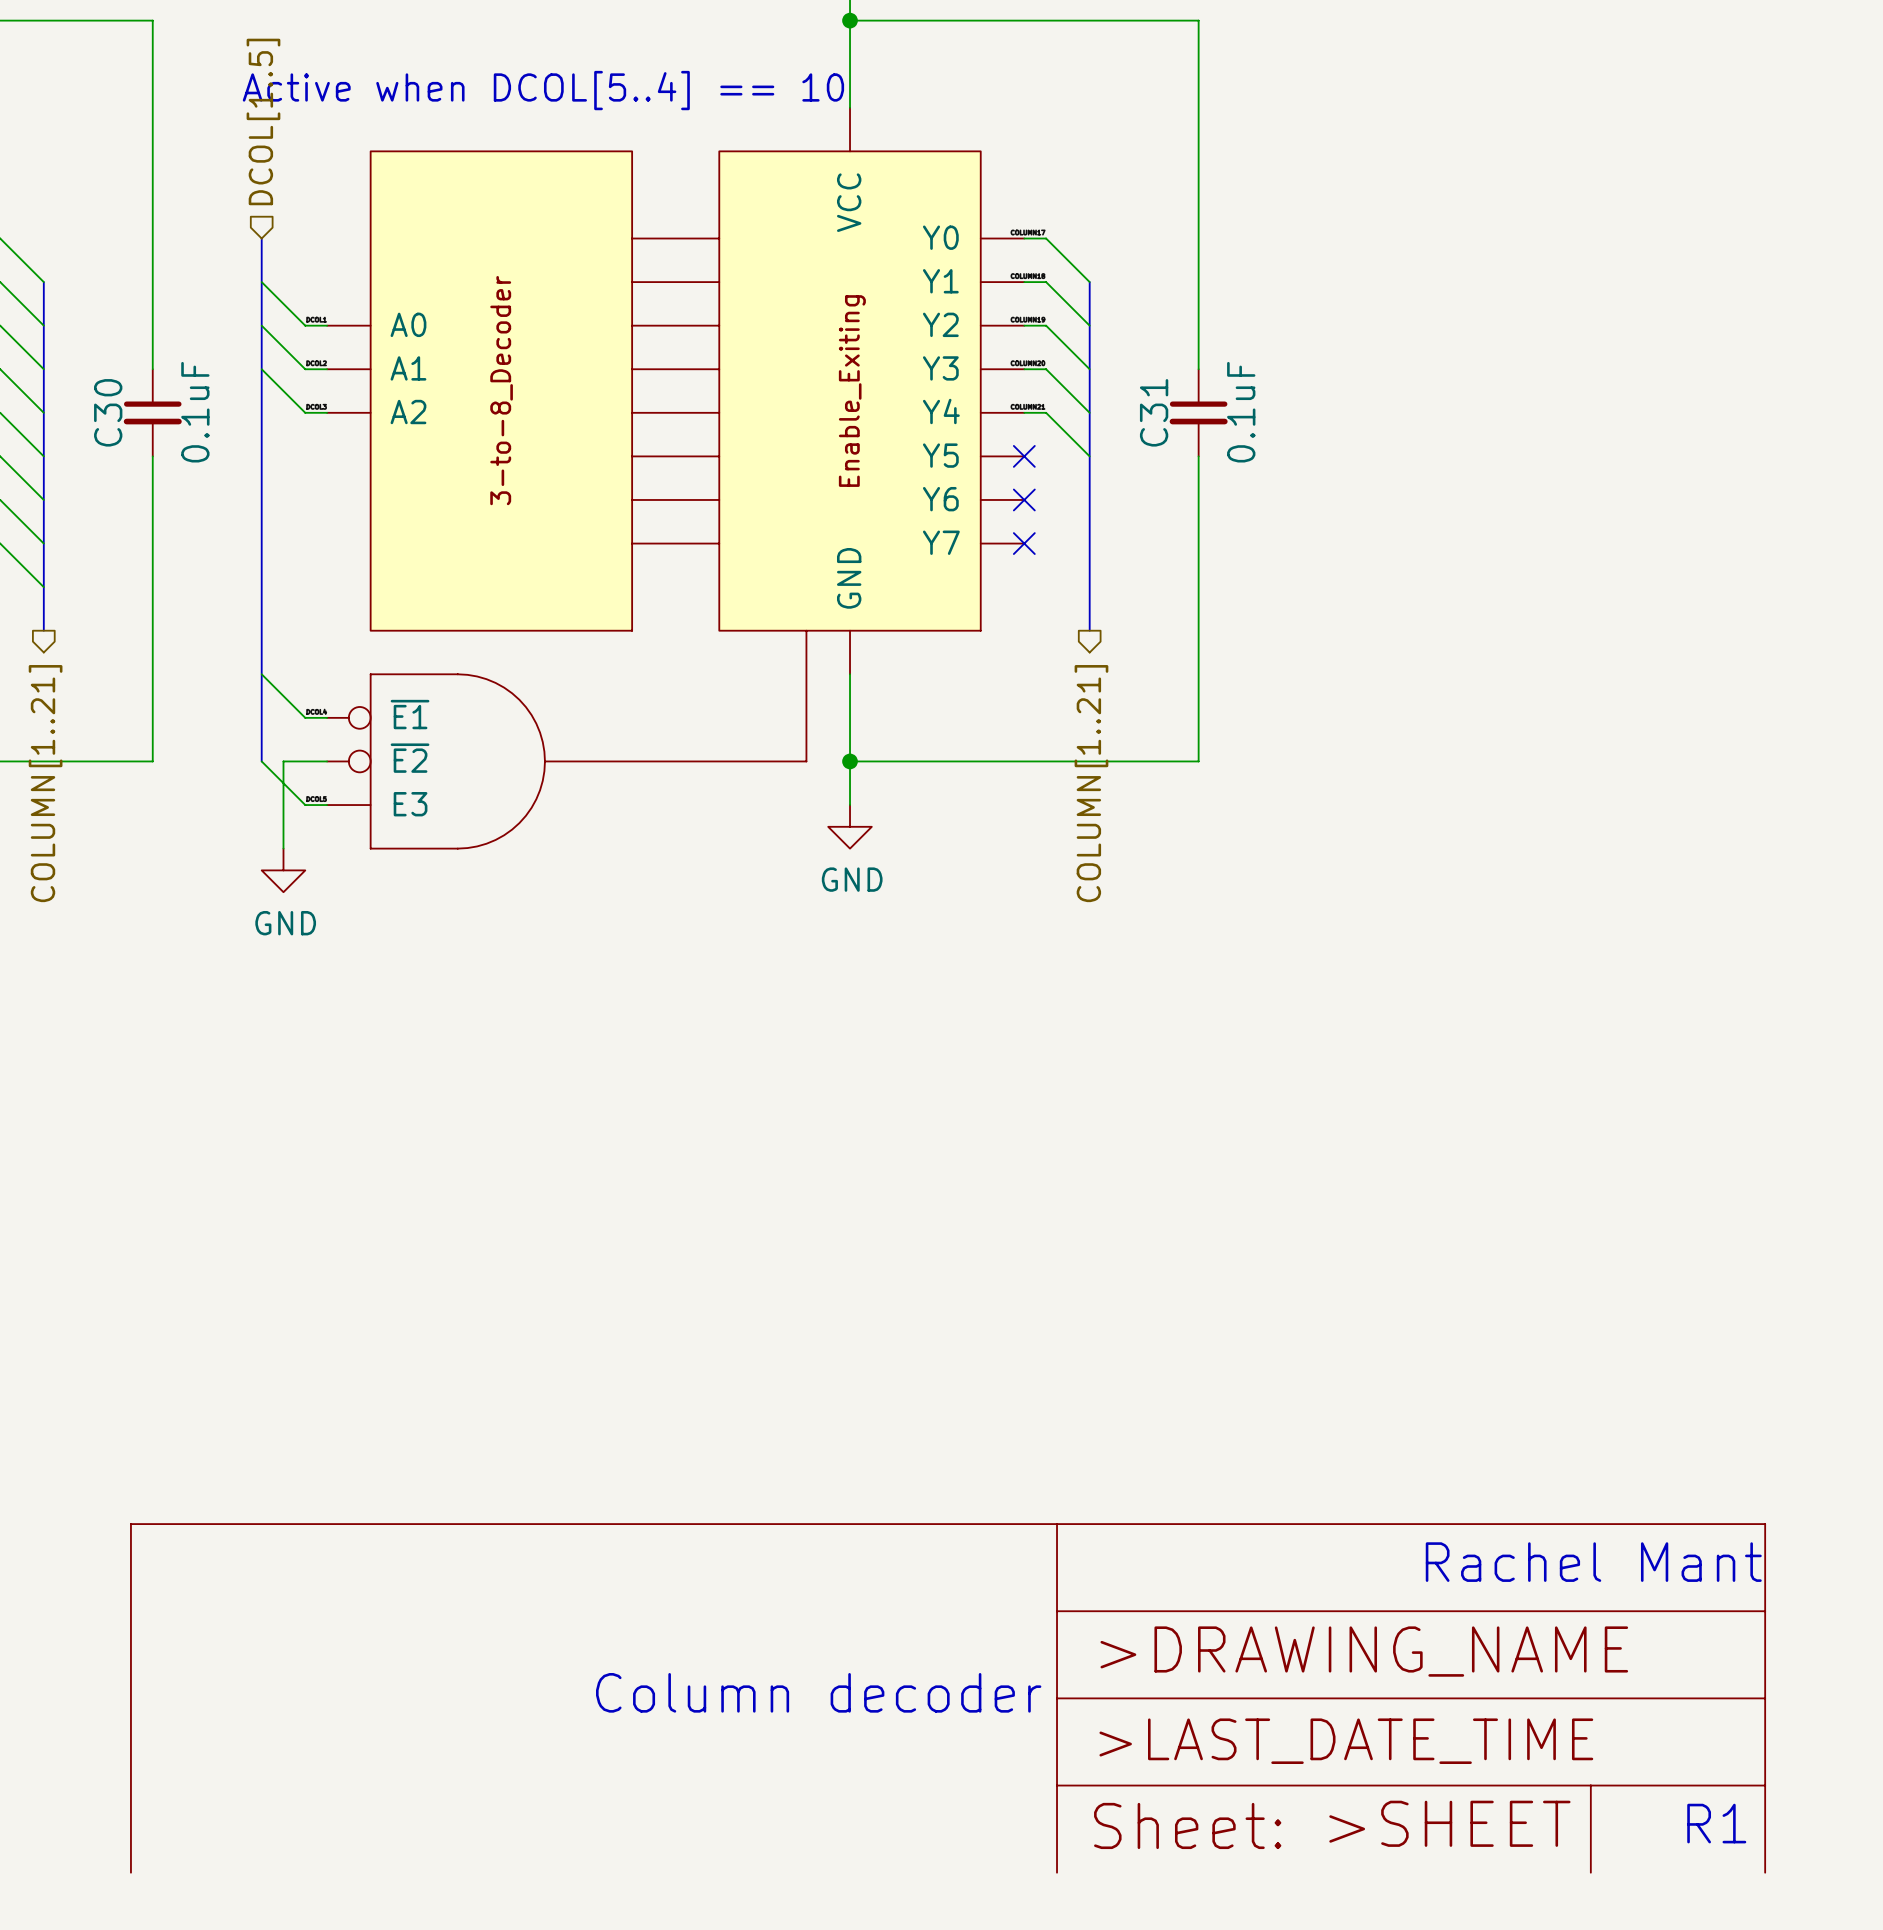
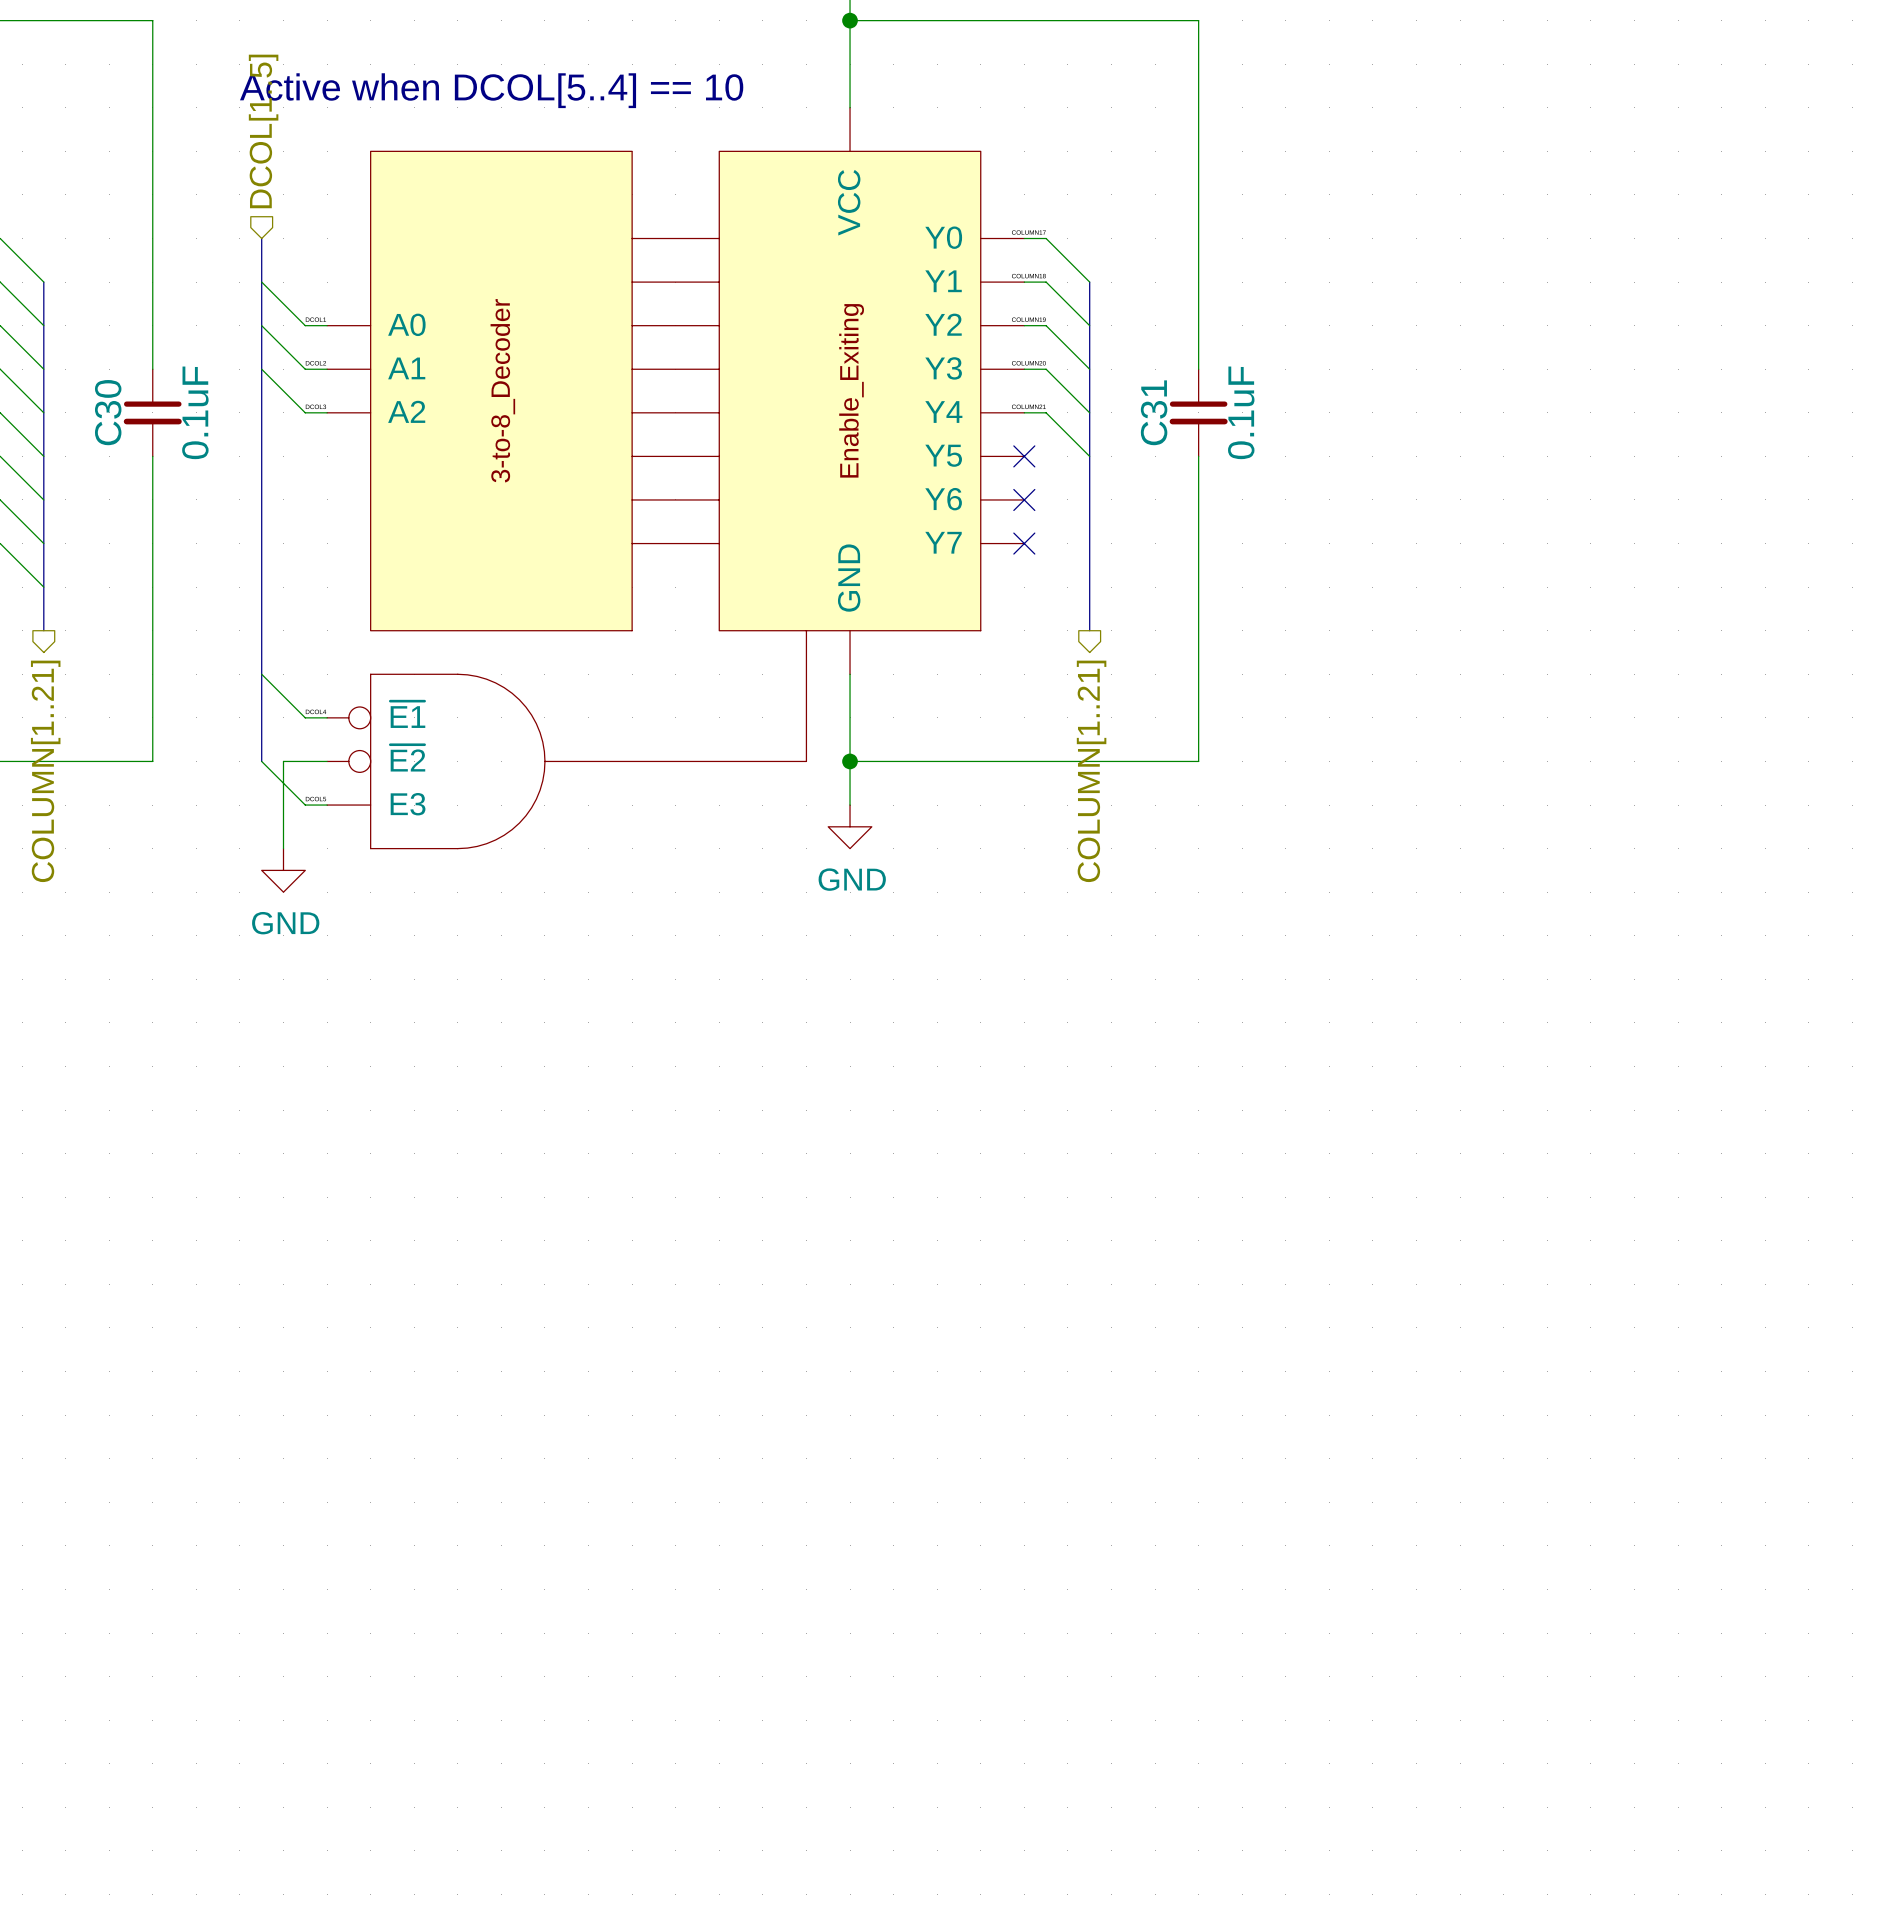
text: Rachel Mant (1593, 1562) -> none
text: Column decoder (818, 1692) -> none
power symbol: (948, 1698) -> none
text: R1 (1716, 1823) -> none

